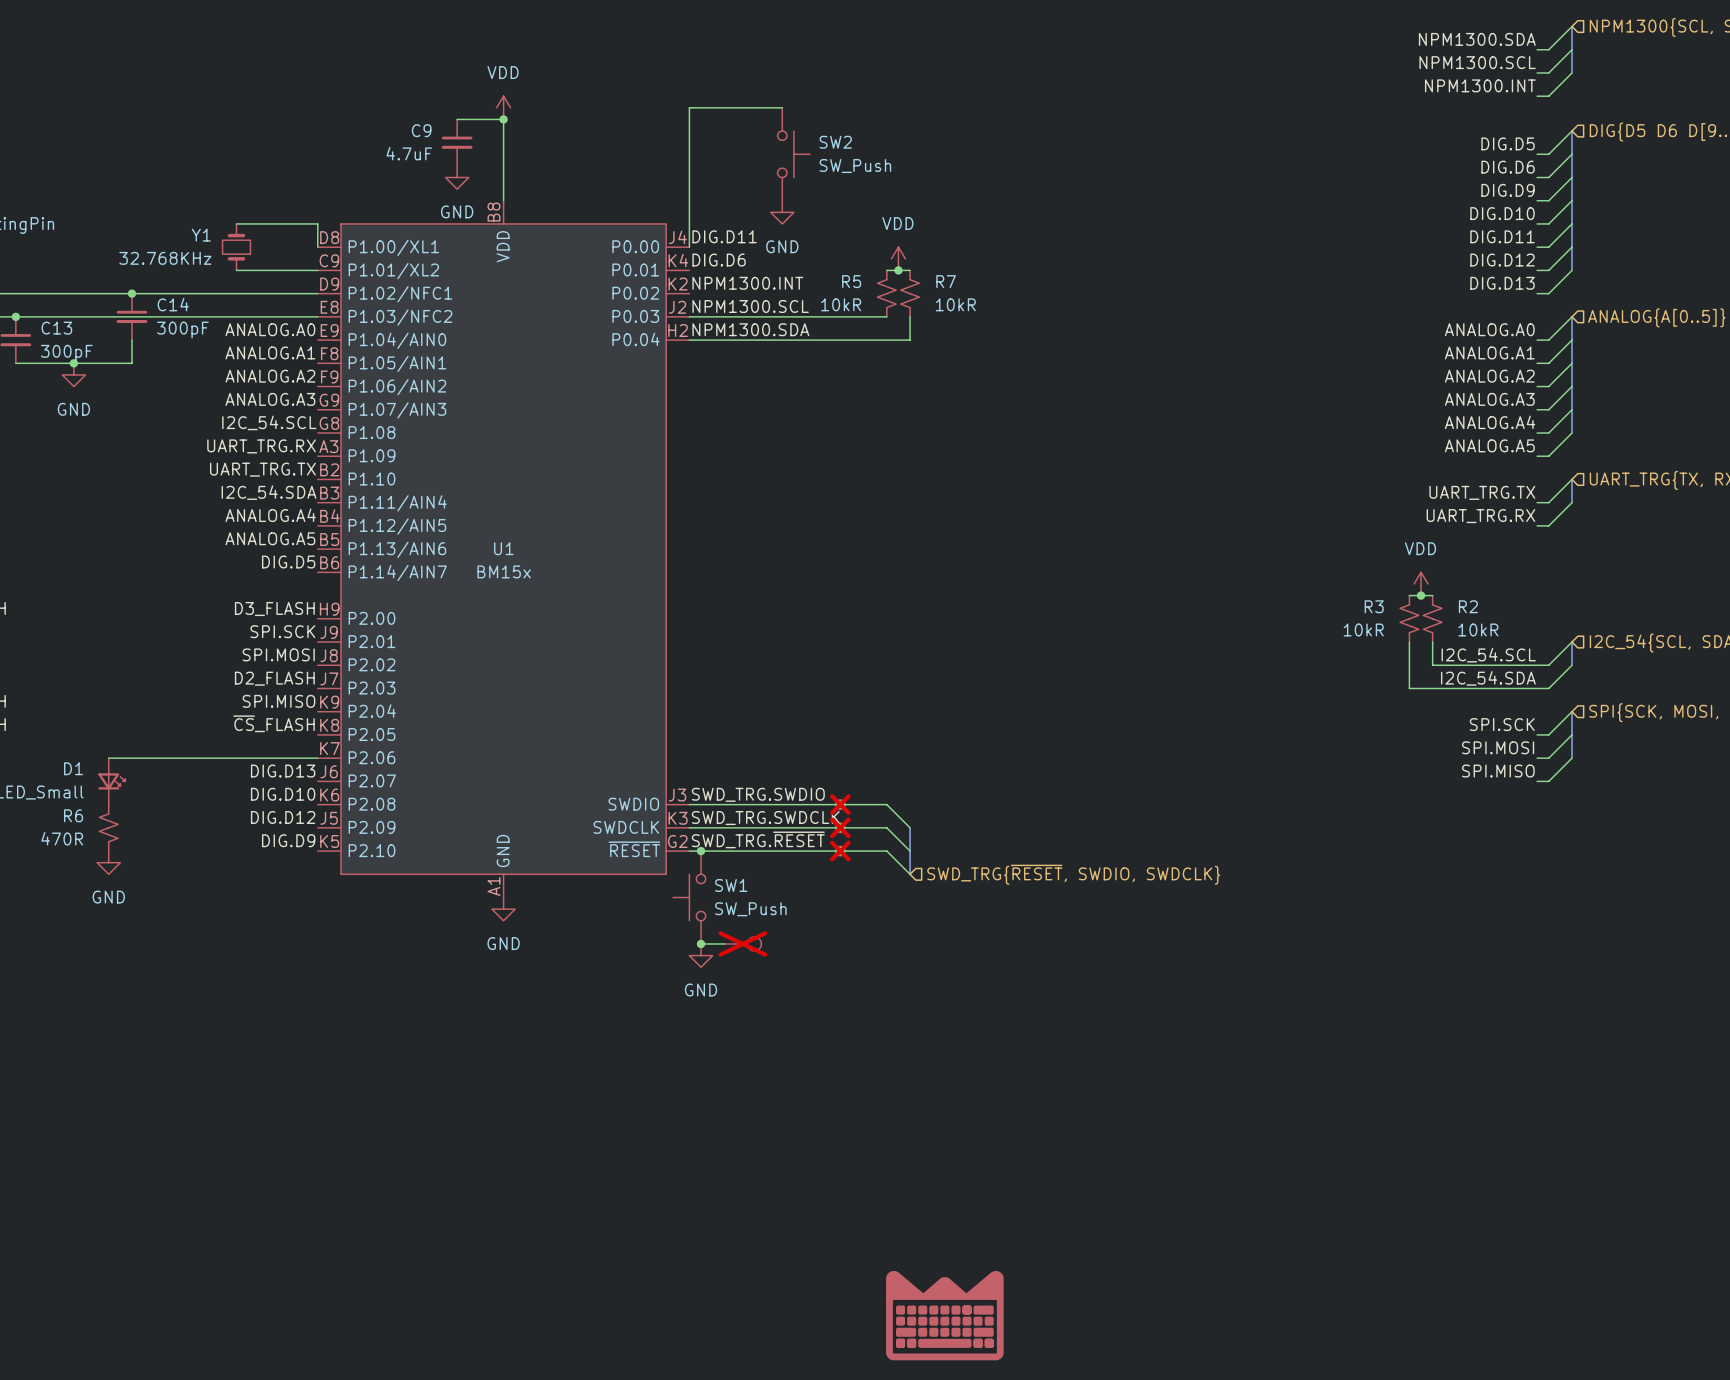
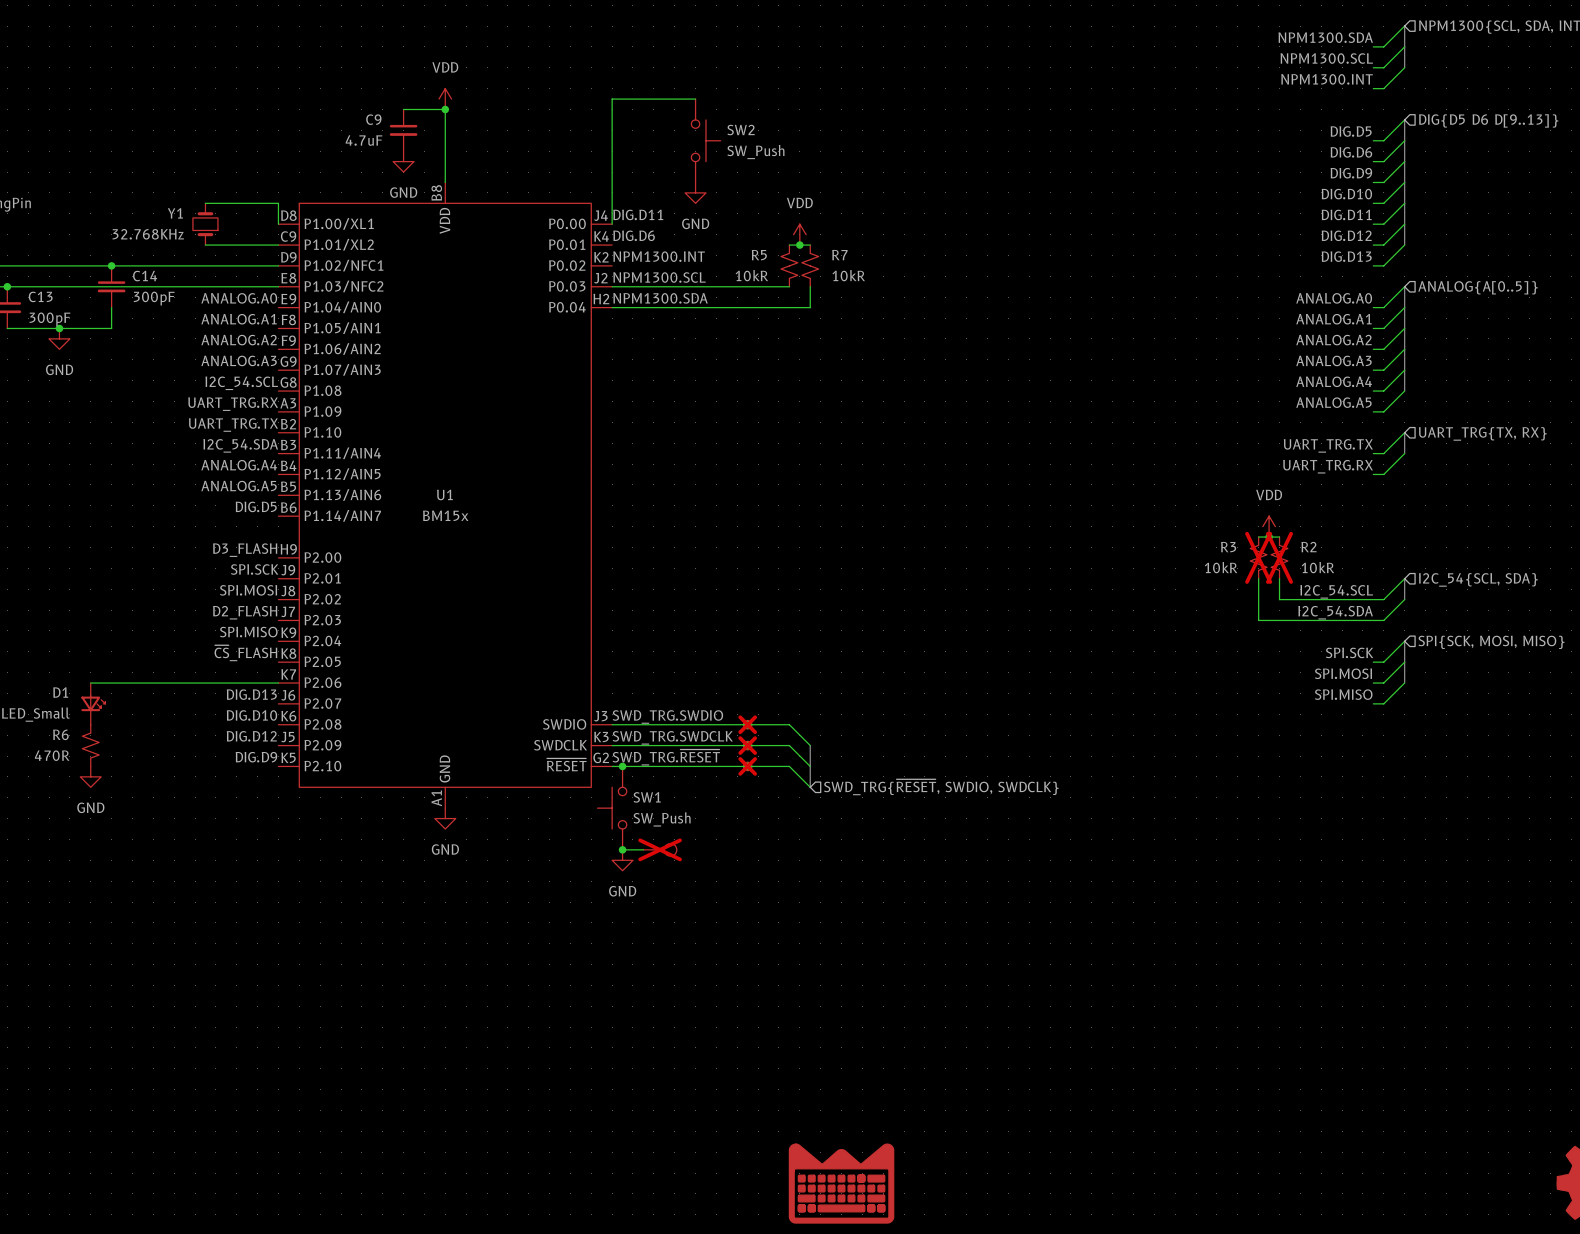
R3 do-not-place cross: none -> (1258, 557)
R2 do-not-place cross: none -> (1279, 557)

